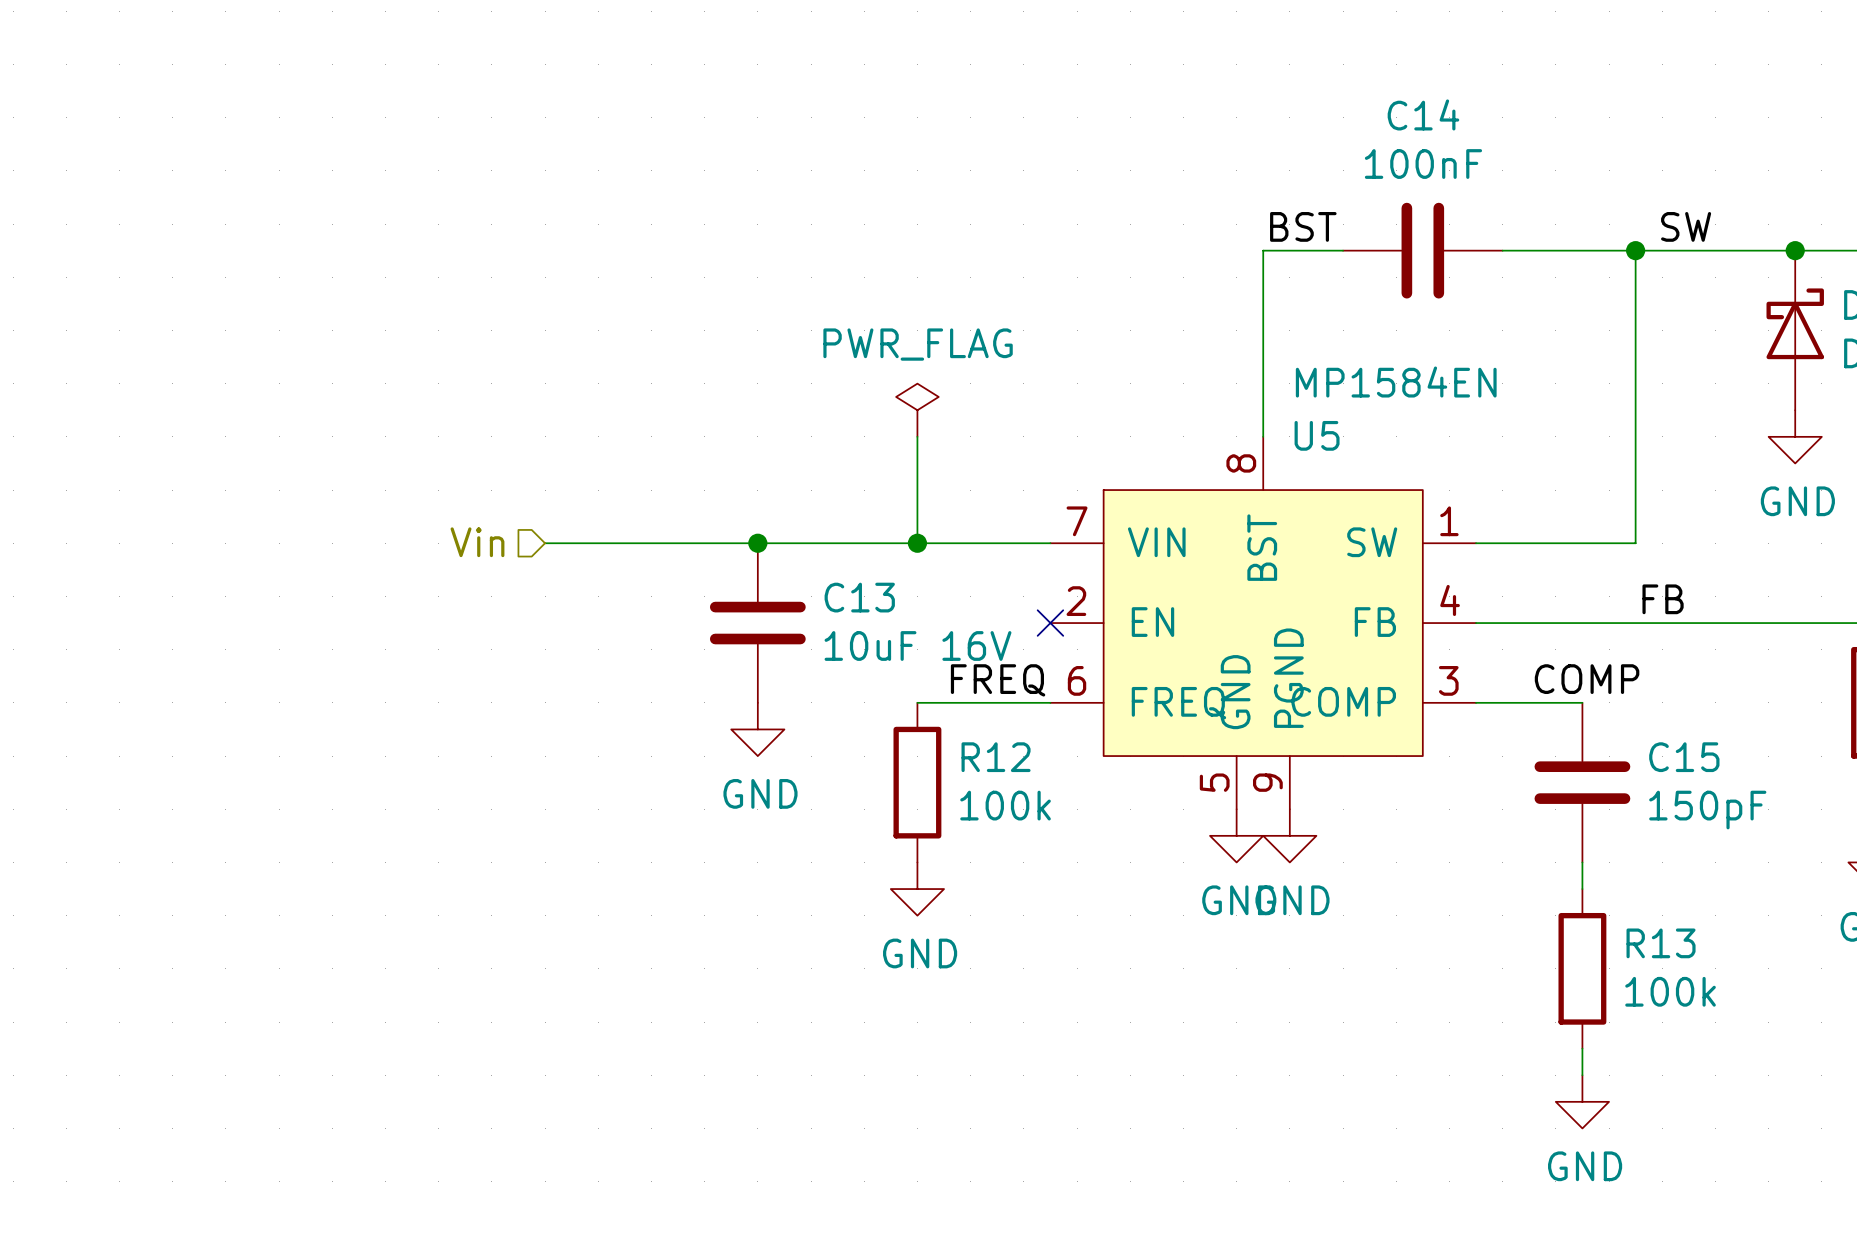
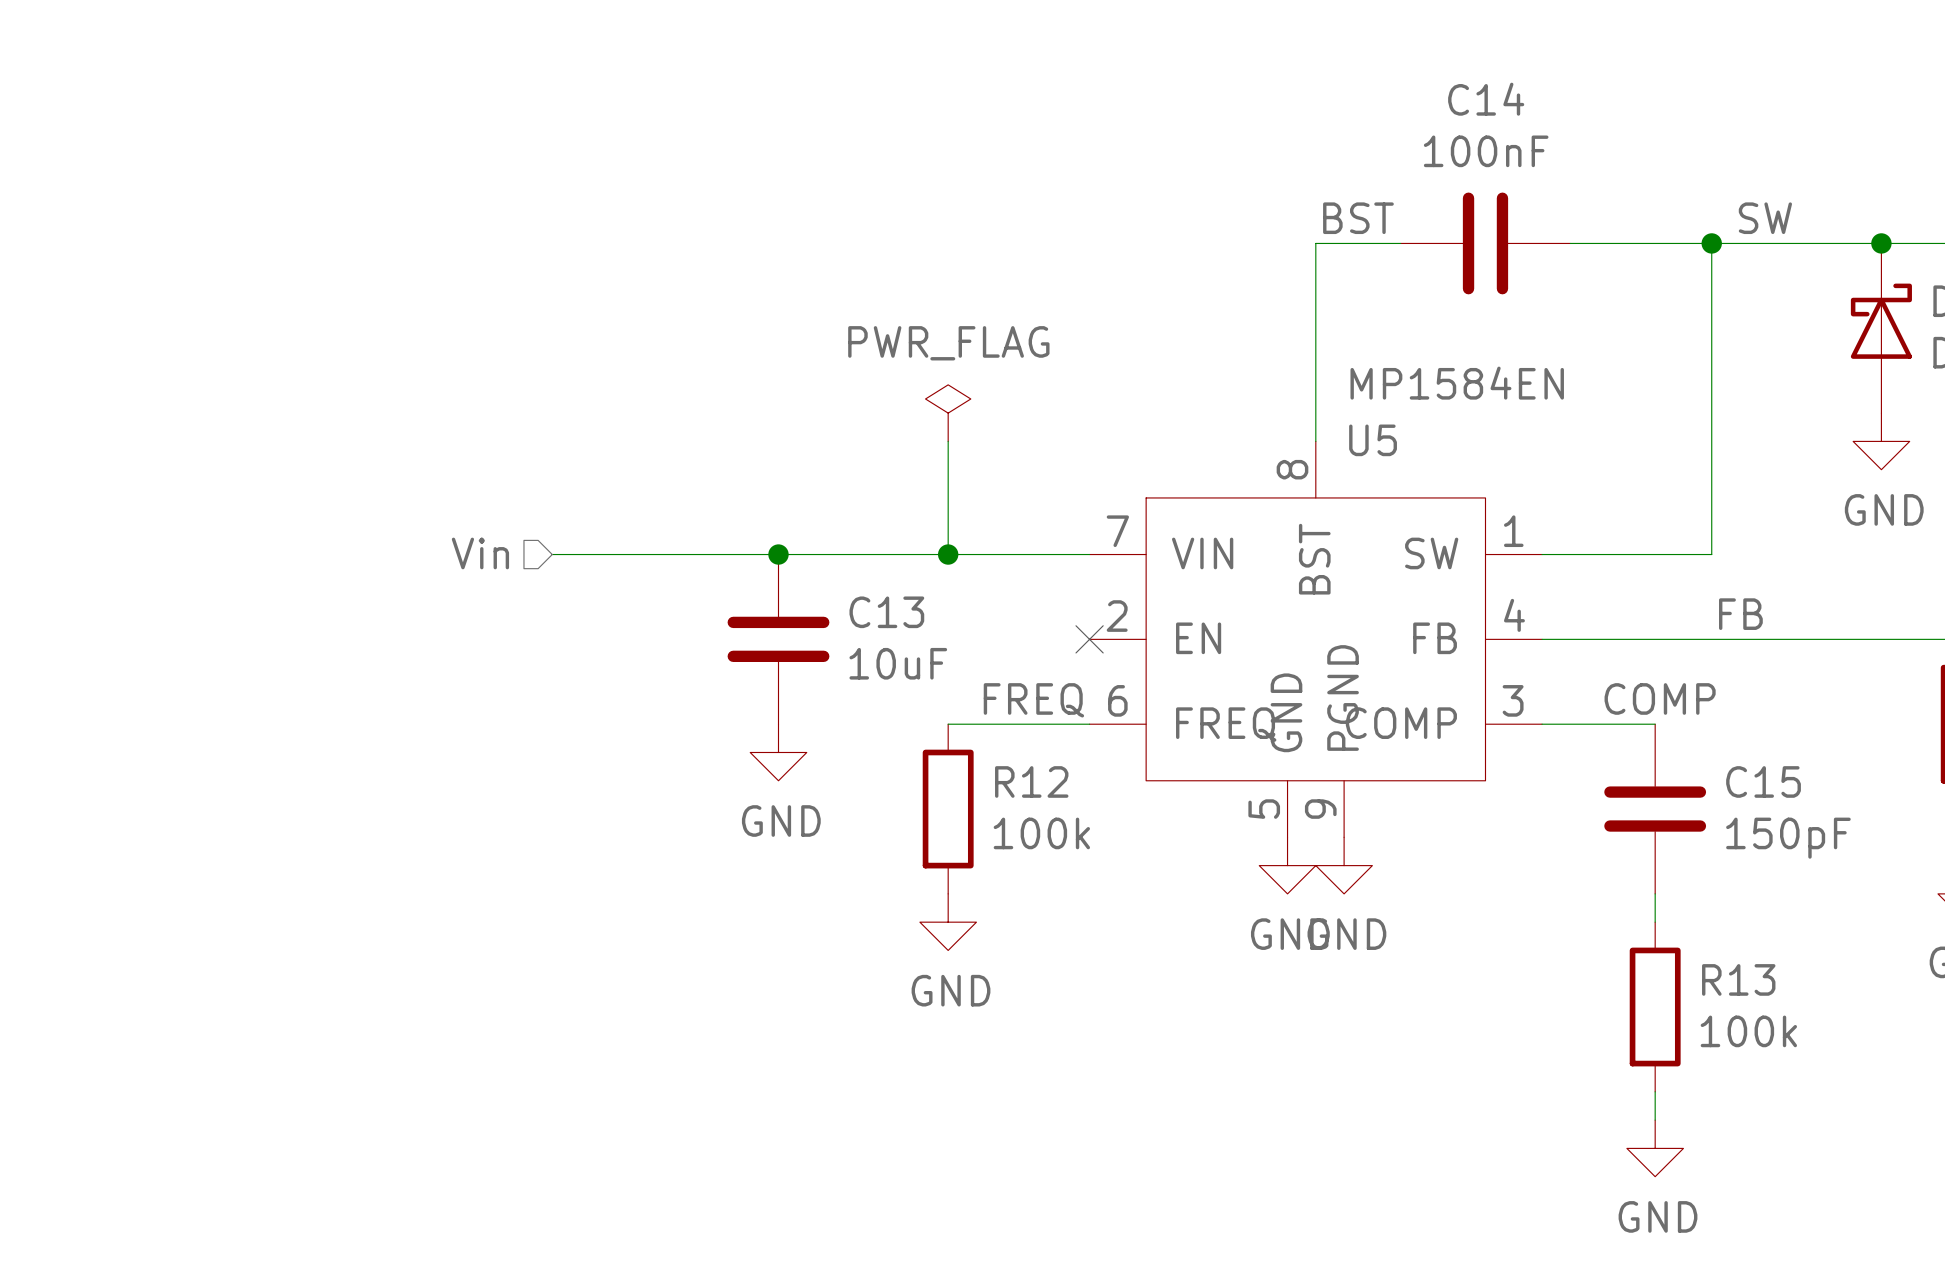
C13 value: 10uF 16V (918, 645) -> 10uF (898, 663)

